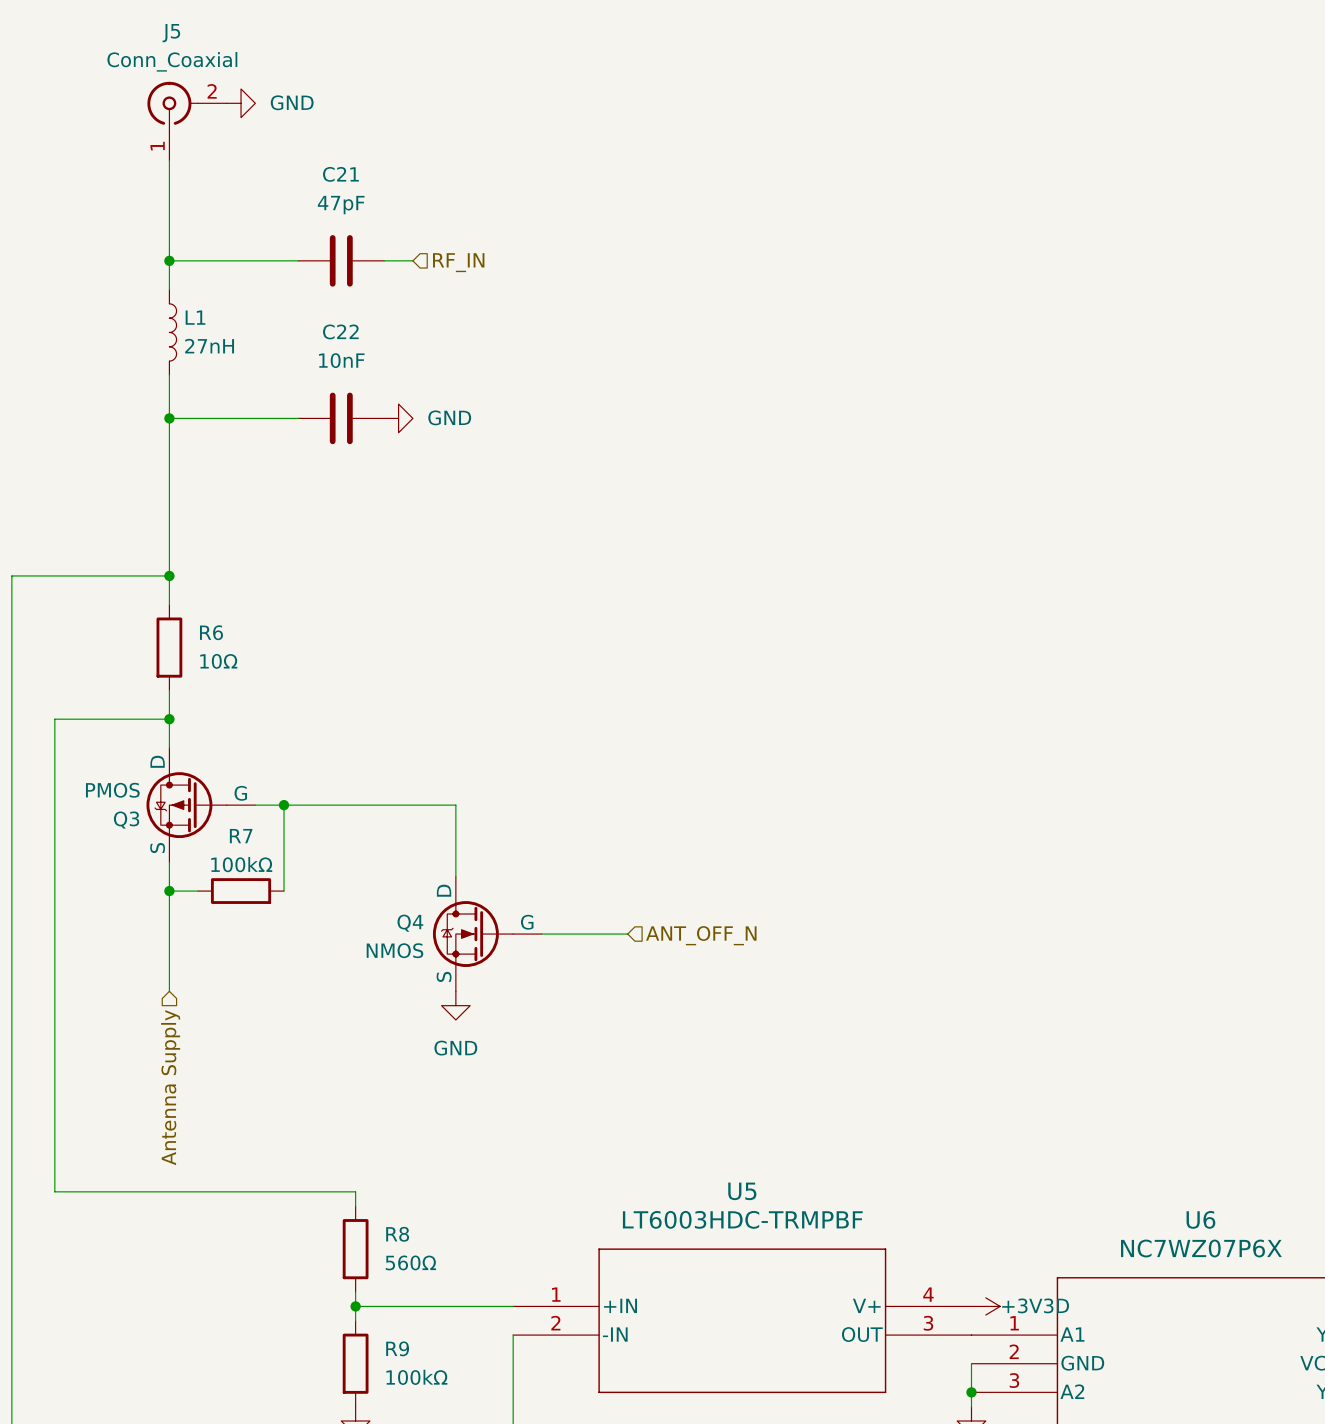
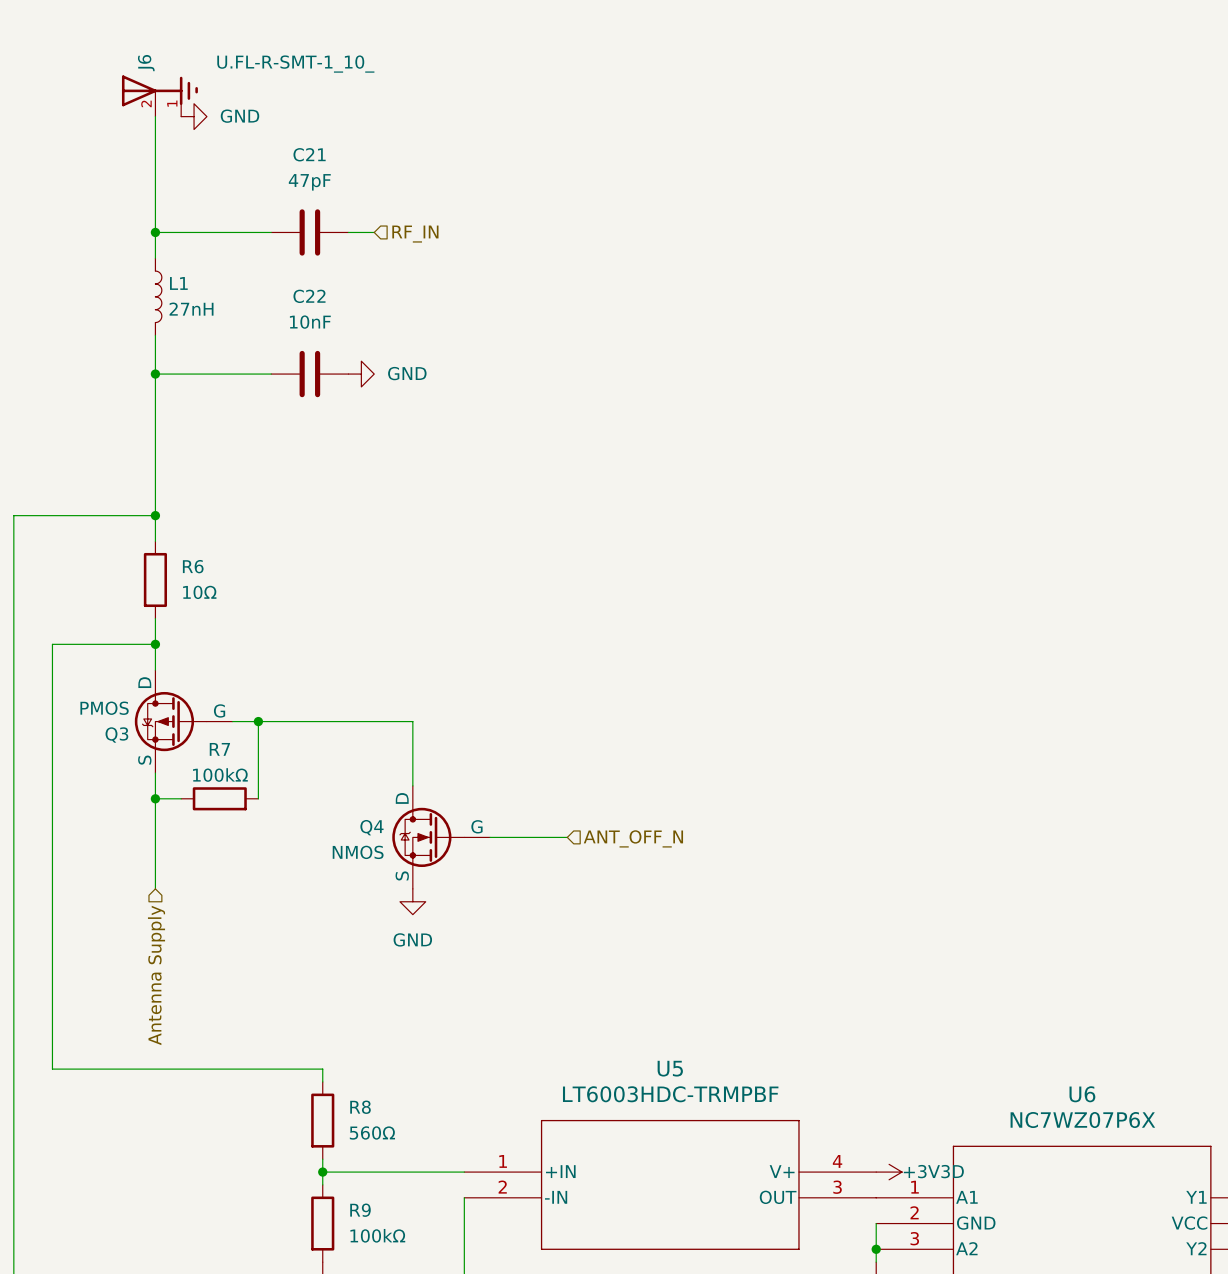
power symbol position: GND (241, 103) -> GND (194, 116)
J6: none -> U.FL-R-SMT-1_10_ (159, 96)
J5: Conn_Coaxial (187, 121) -> none

